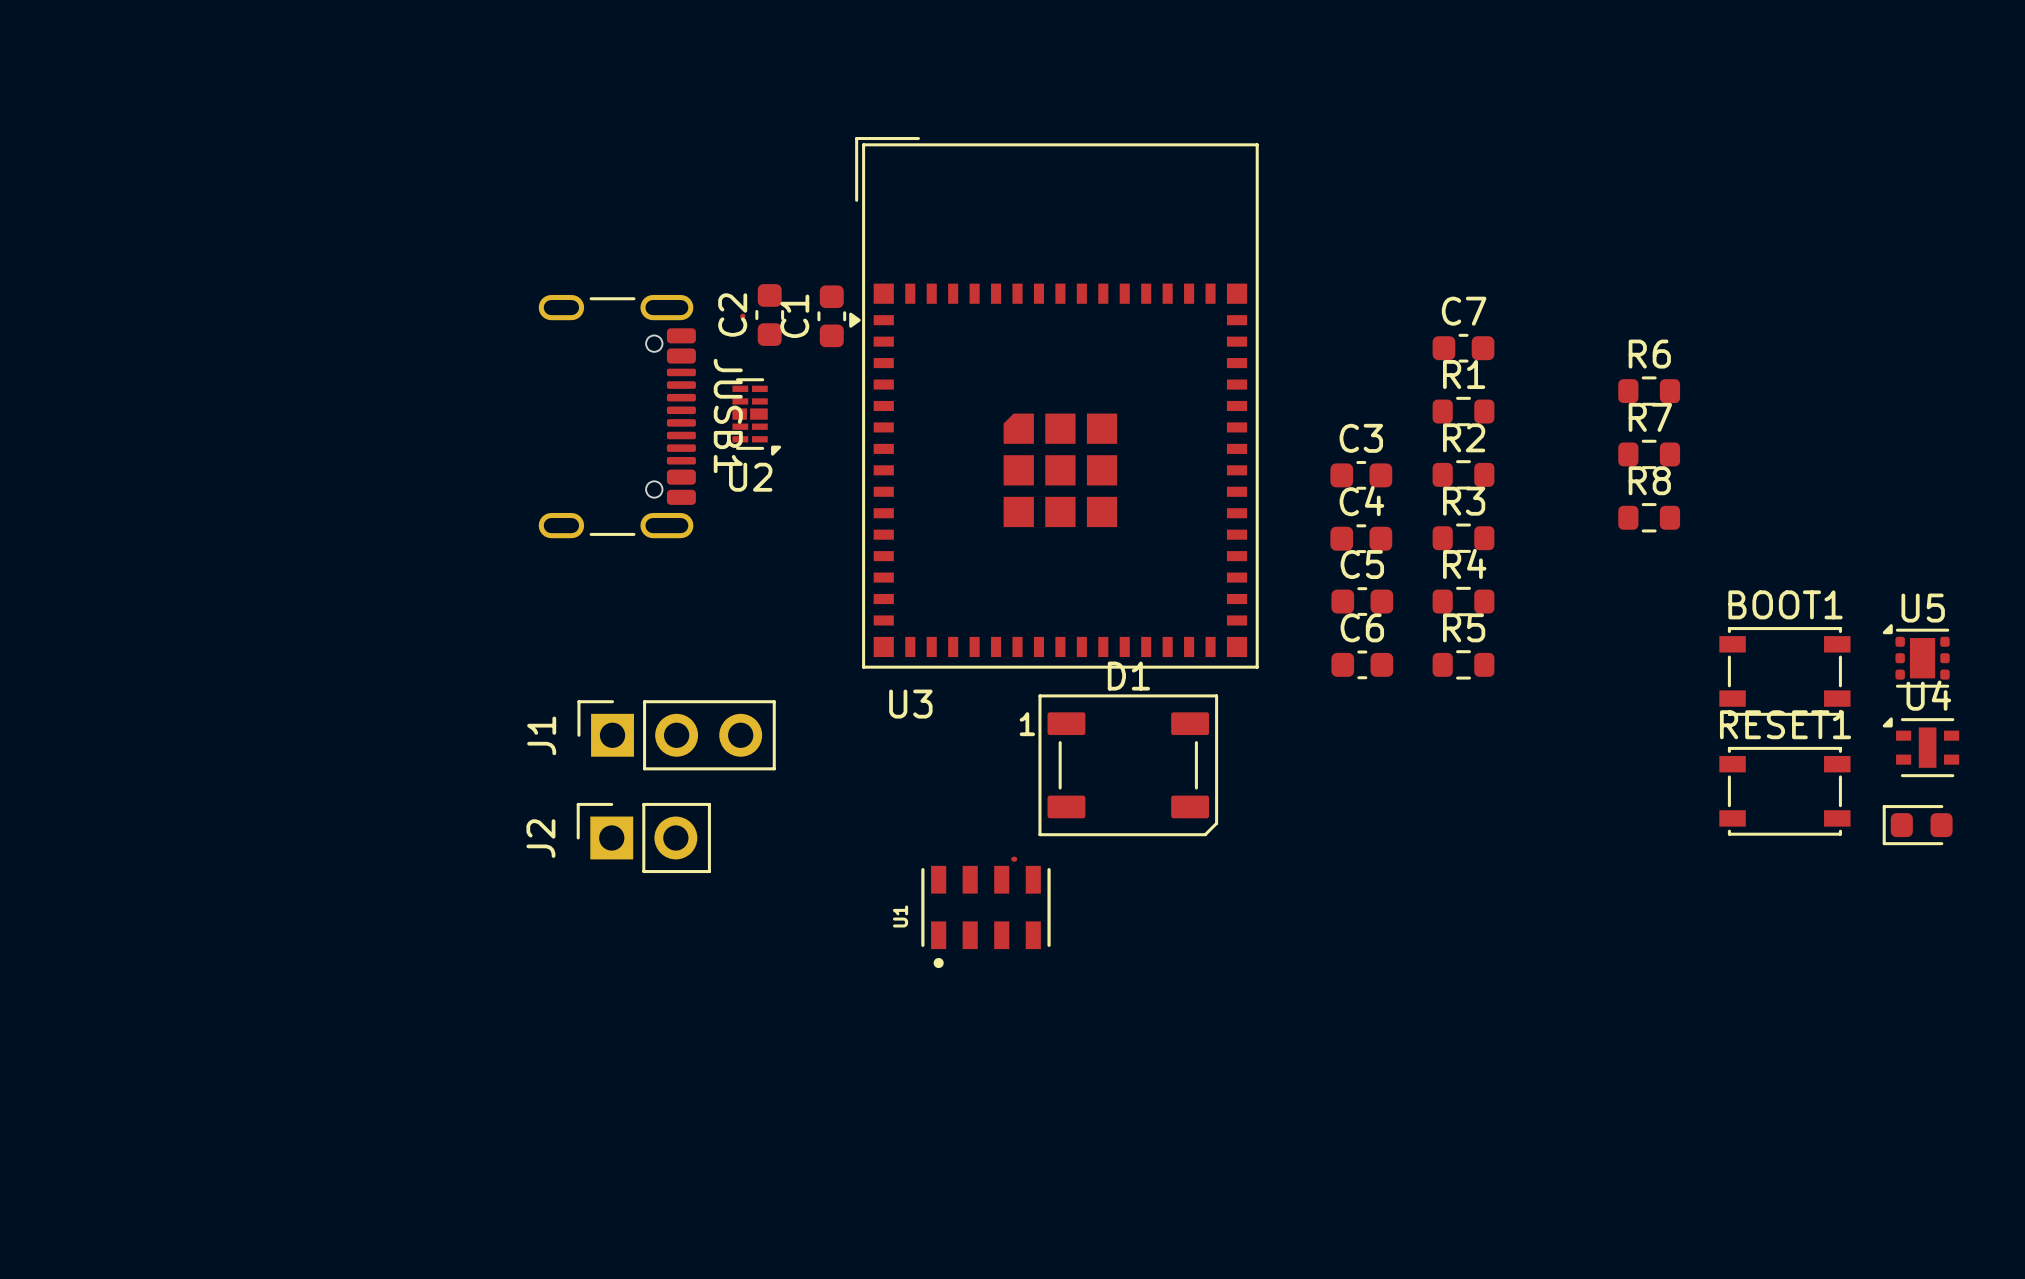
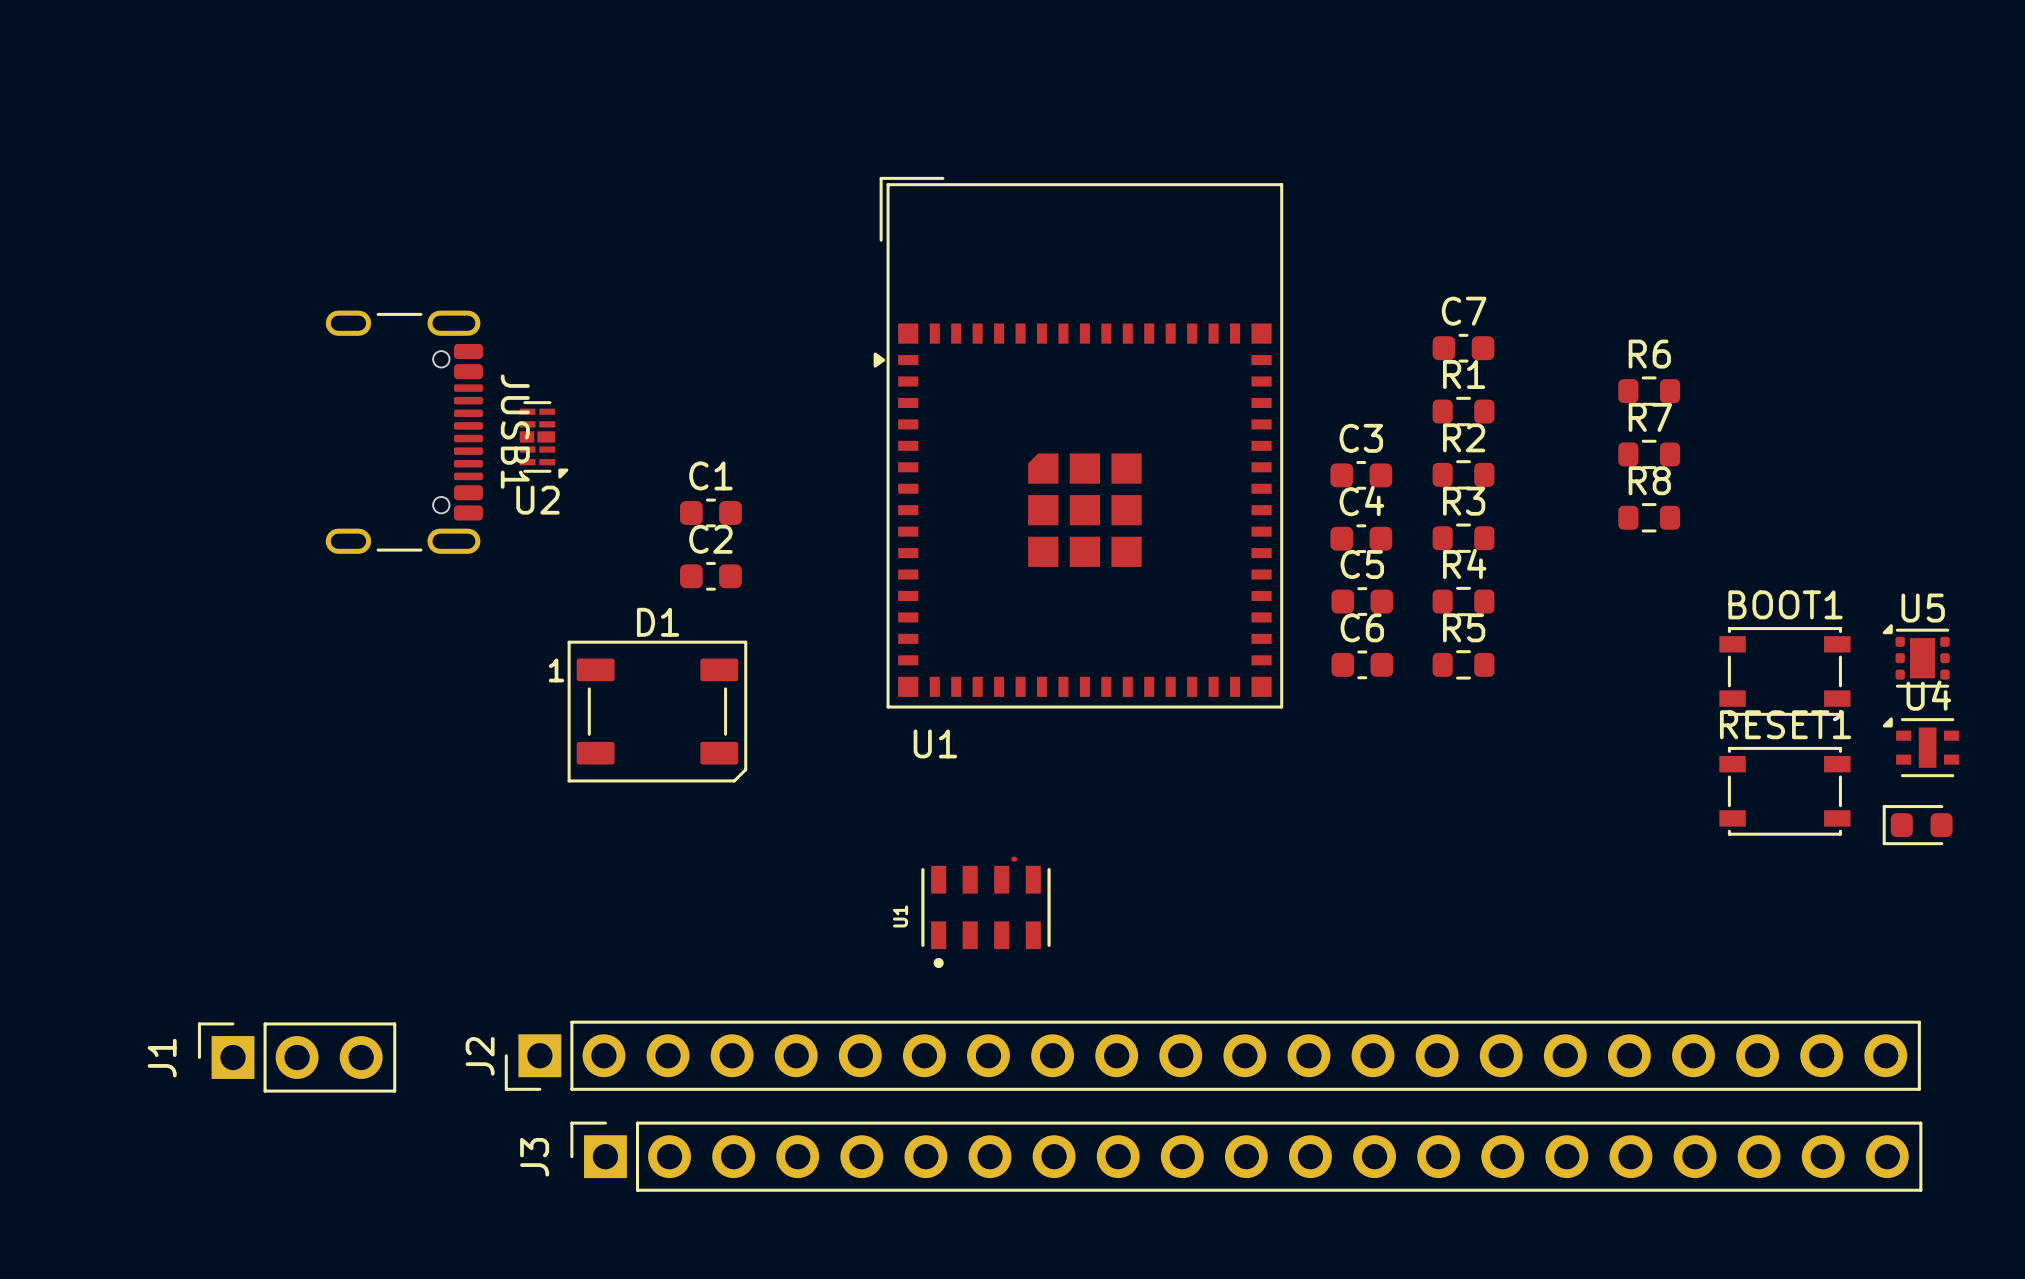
C2 rotation: 0° (769, 315) -> 90° clockwise (710, 576)
C2 position: (769, 315) -> (710, 576)
track: (742, 316) (742, 316) -> none
C1 rotation: 0° (831, 316) -> 90° clockwise (710, 512)
C1 position: (831, 316) -> (710, 512)
U3: (1053, 402) -> none
JUSB1 position: (617, 416) -> (404, 432)
U2 position: (756, 416) -> (544, 439)
U1: none -> (1078, 442)
J1 position: (676, 735) -> (297, 1057)
D1 position: (1128, 765) -> (657, 711)
J2 footprint: [576, 802, 711, 874] -> [504, 1020, 1921, 1091]
J2 name position: J2 (540, 838) -> J2 (480, 1056)
J3: none -> (1246, 1156)

